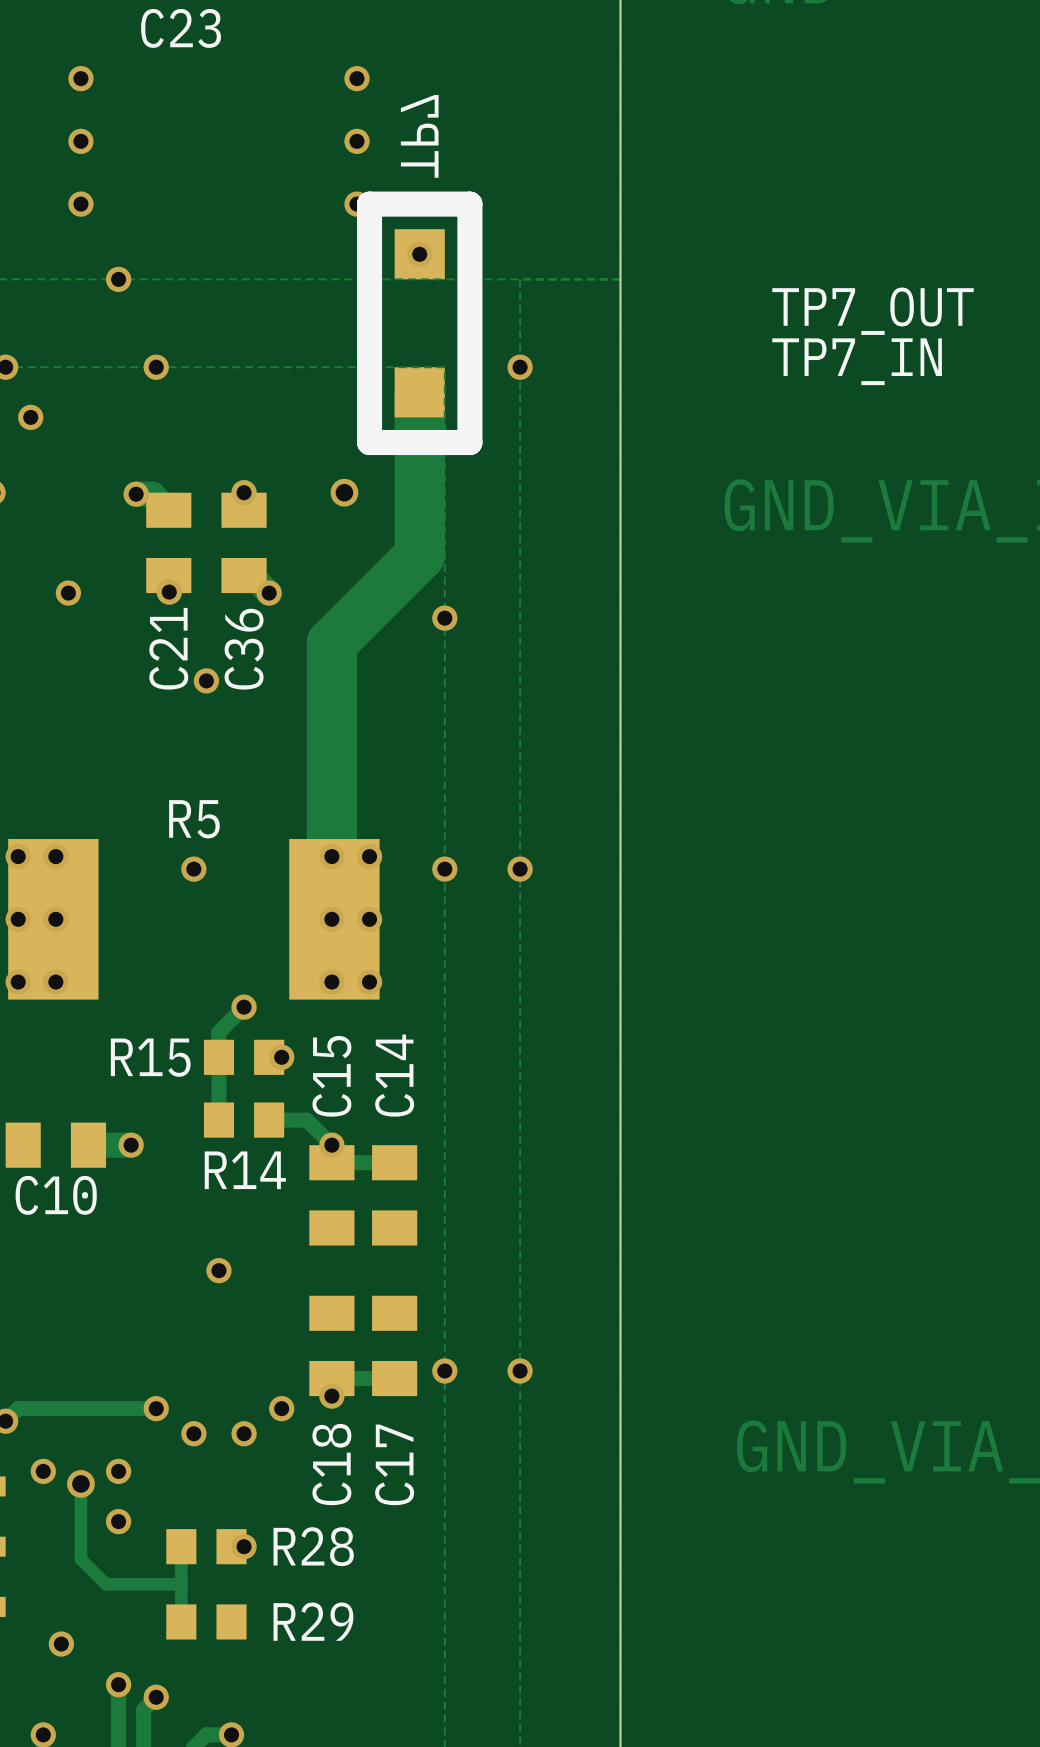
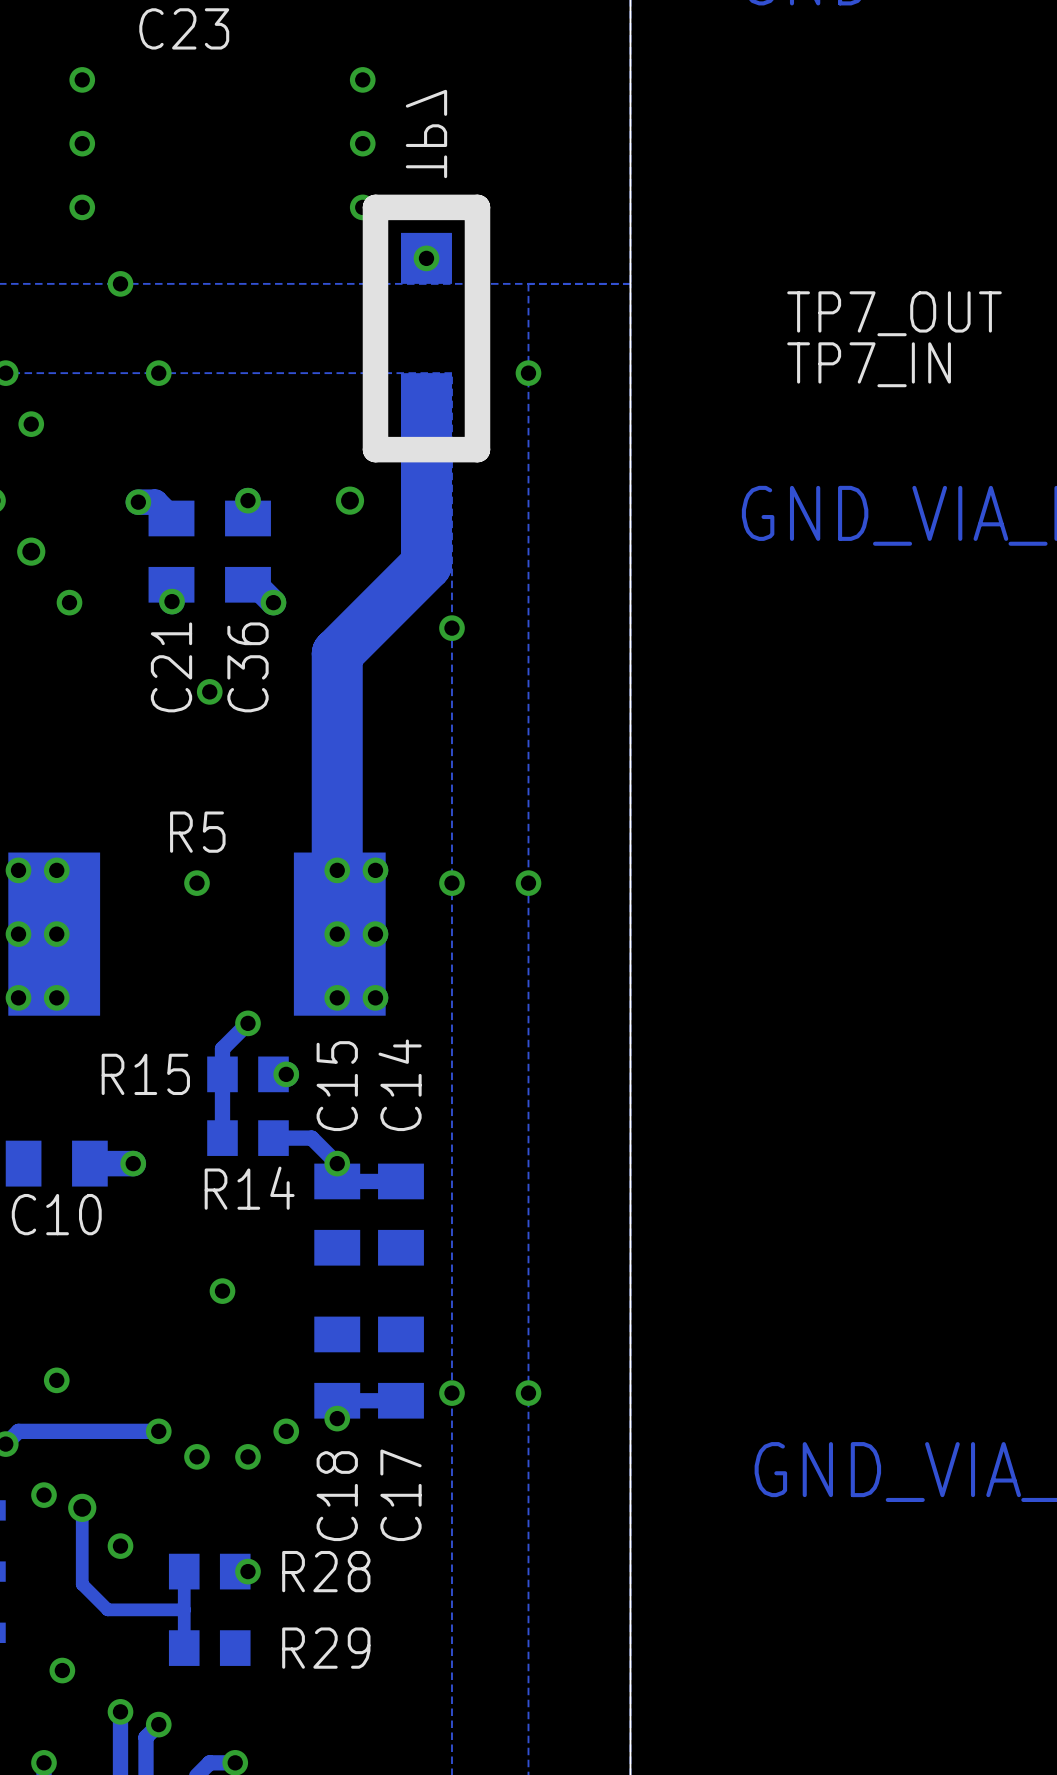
via: none -> (31, 551)
via position: (118, 1471) -> (56, 1380)

